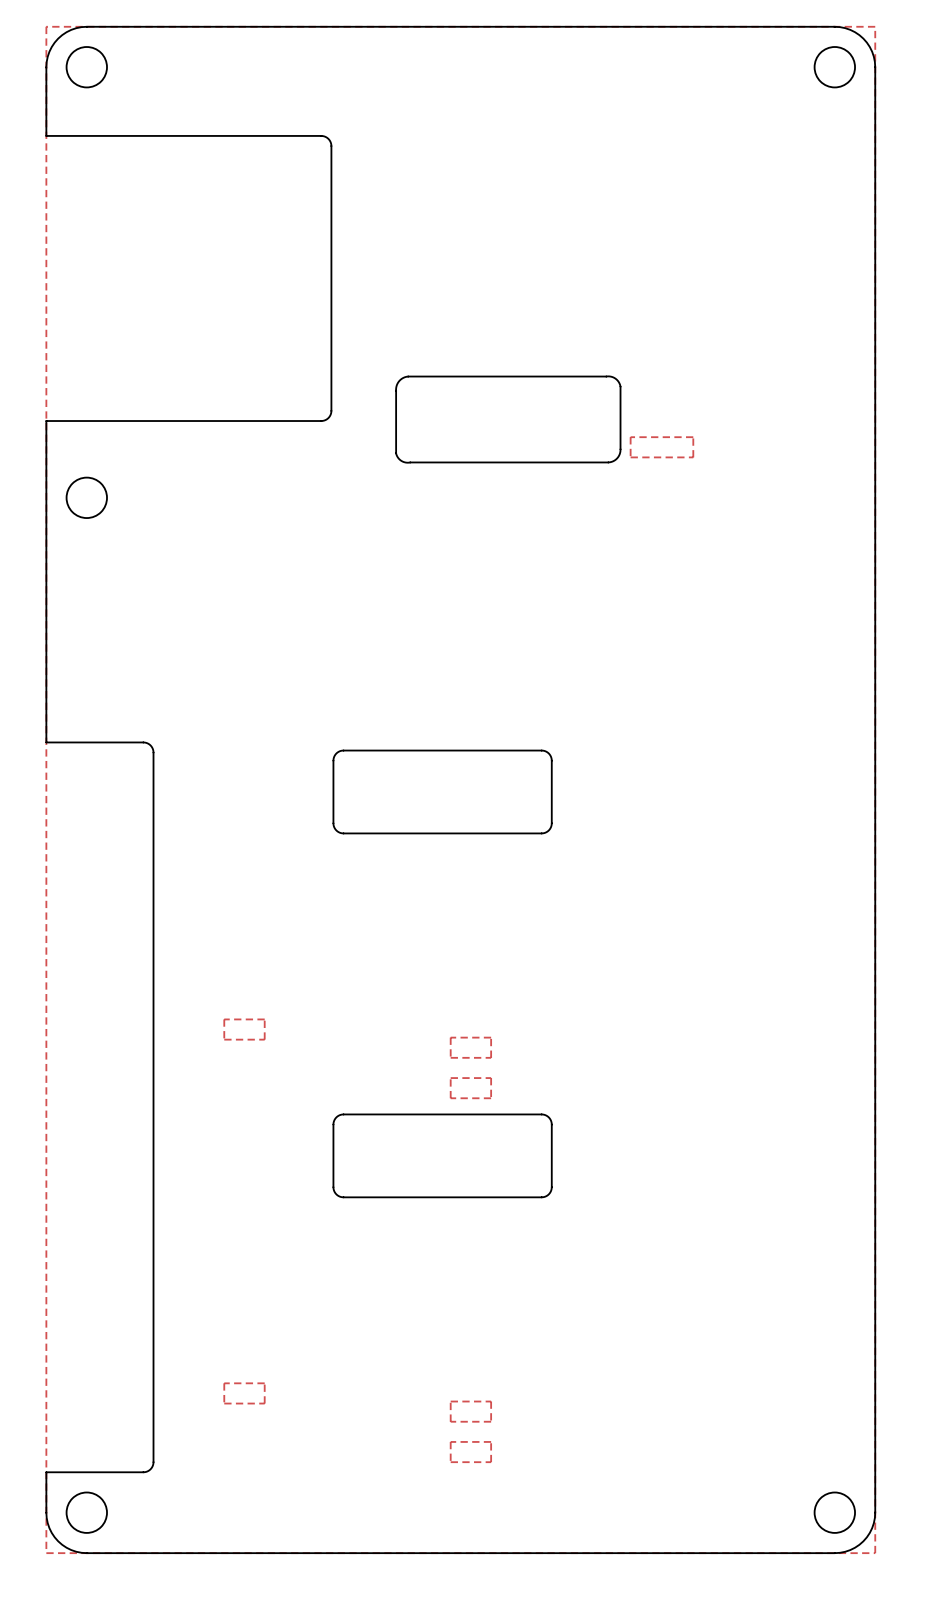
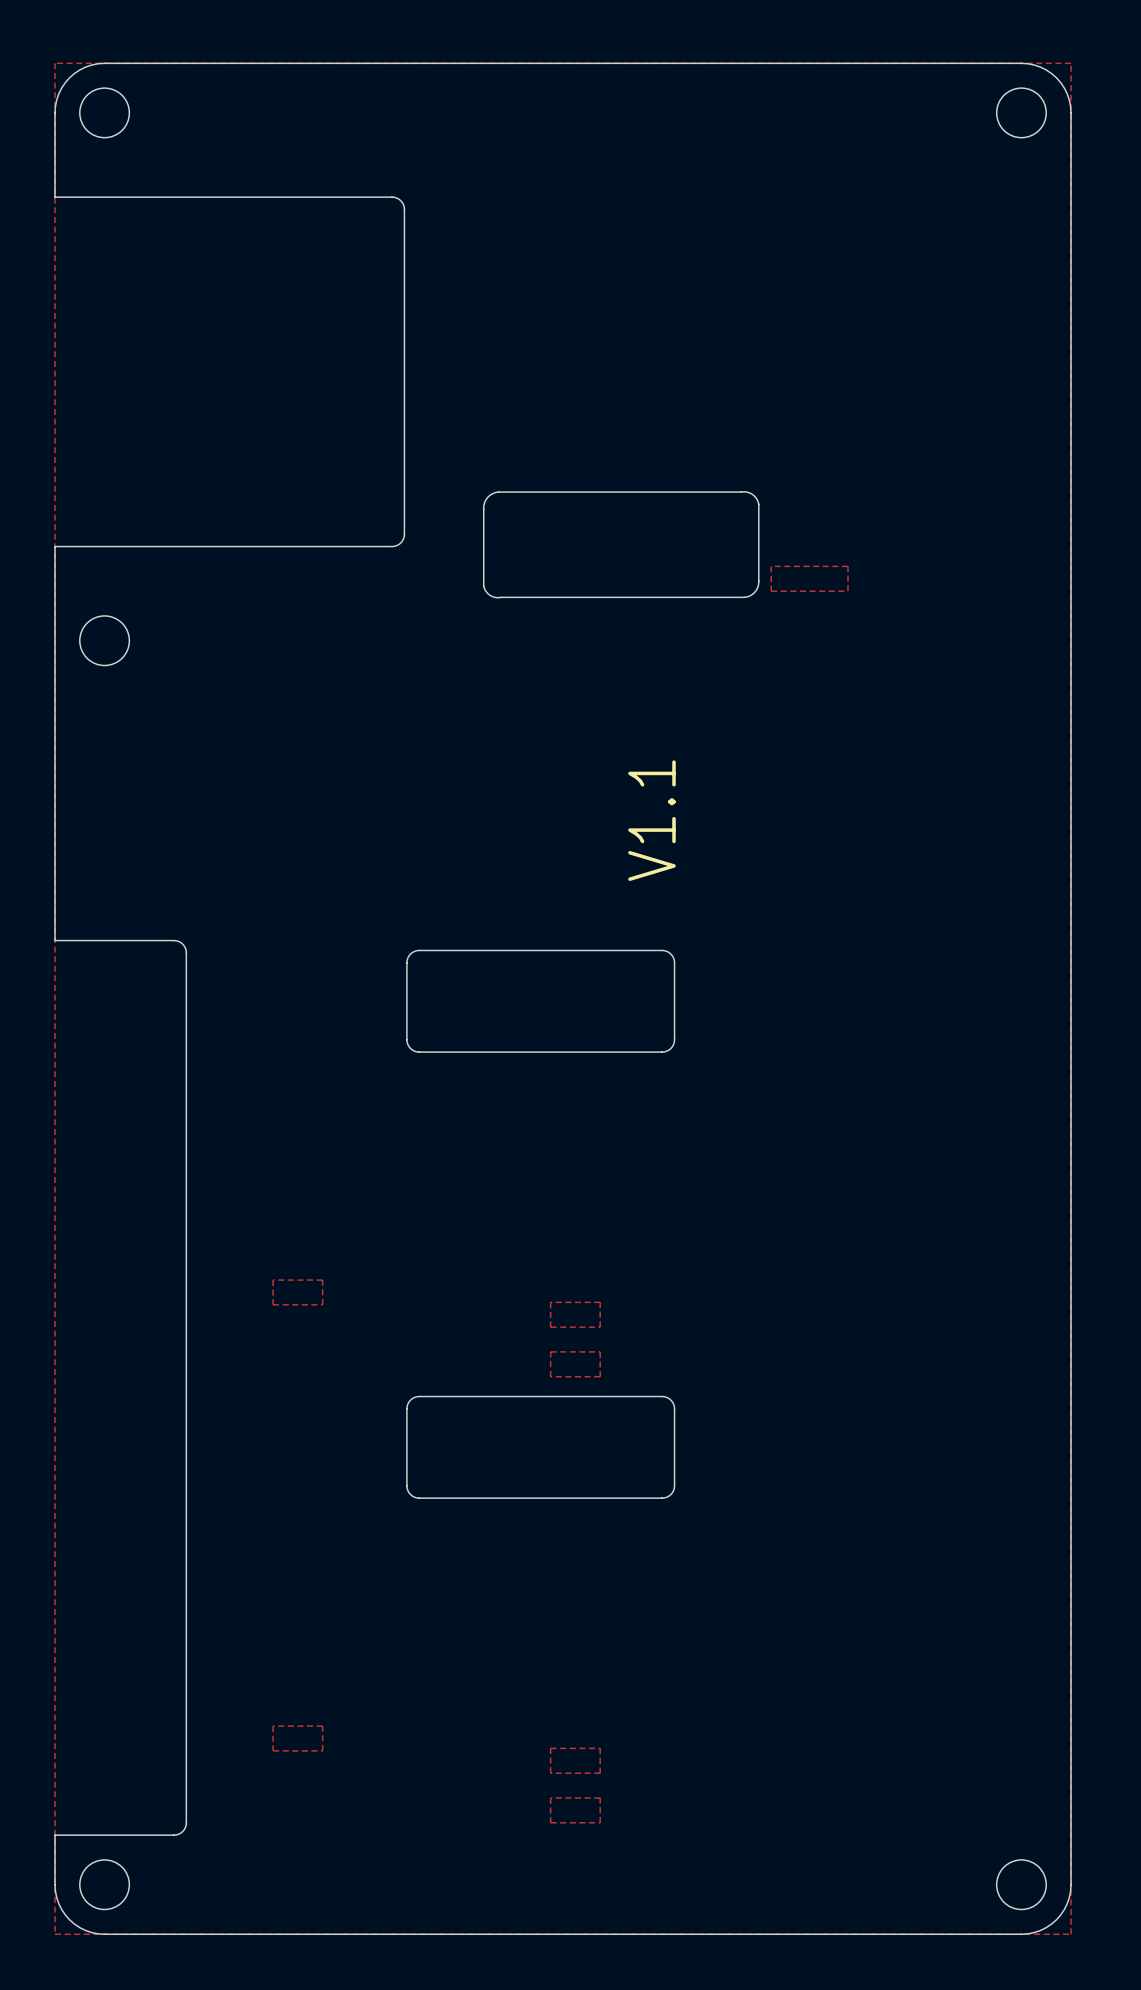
text: none -> V1.1 (651, 820)

